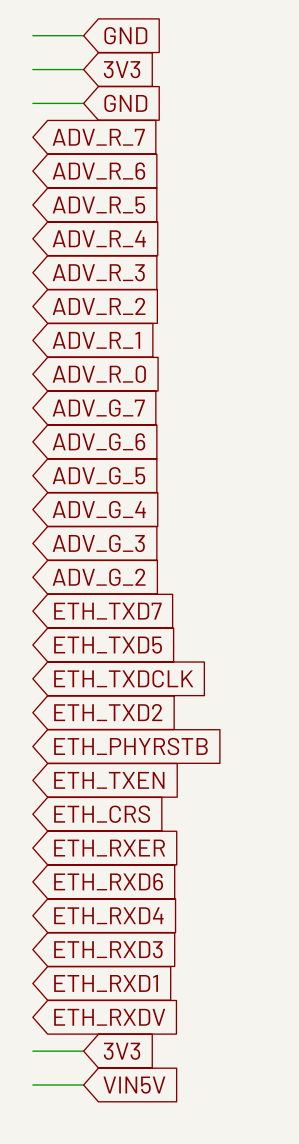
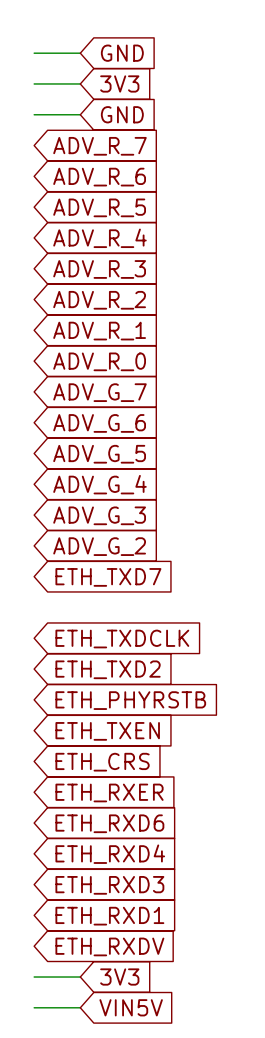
global label: ETH_TXD5 (108, 645) -> none

